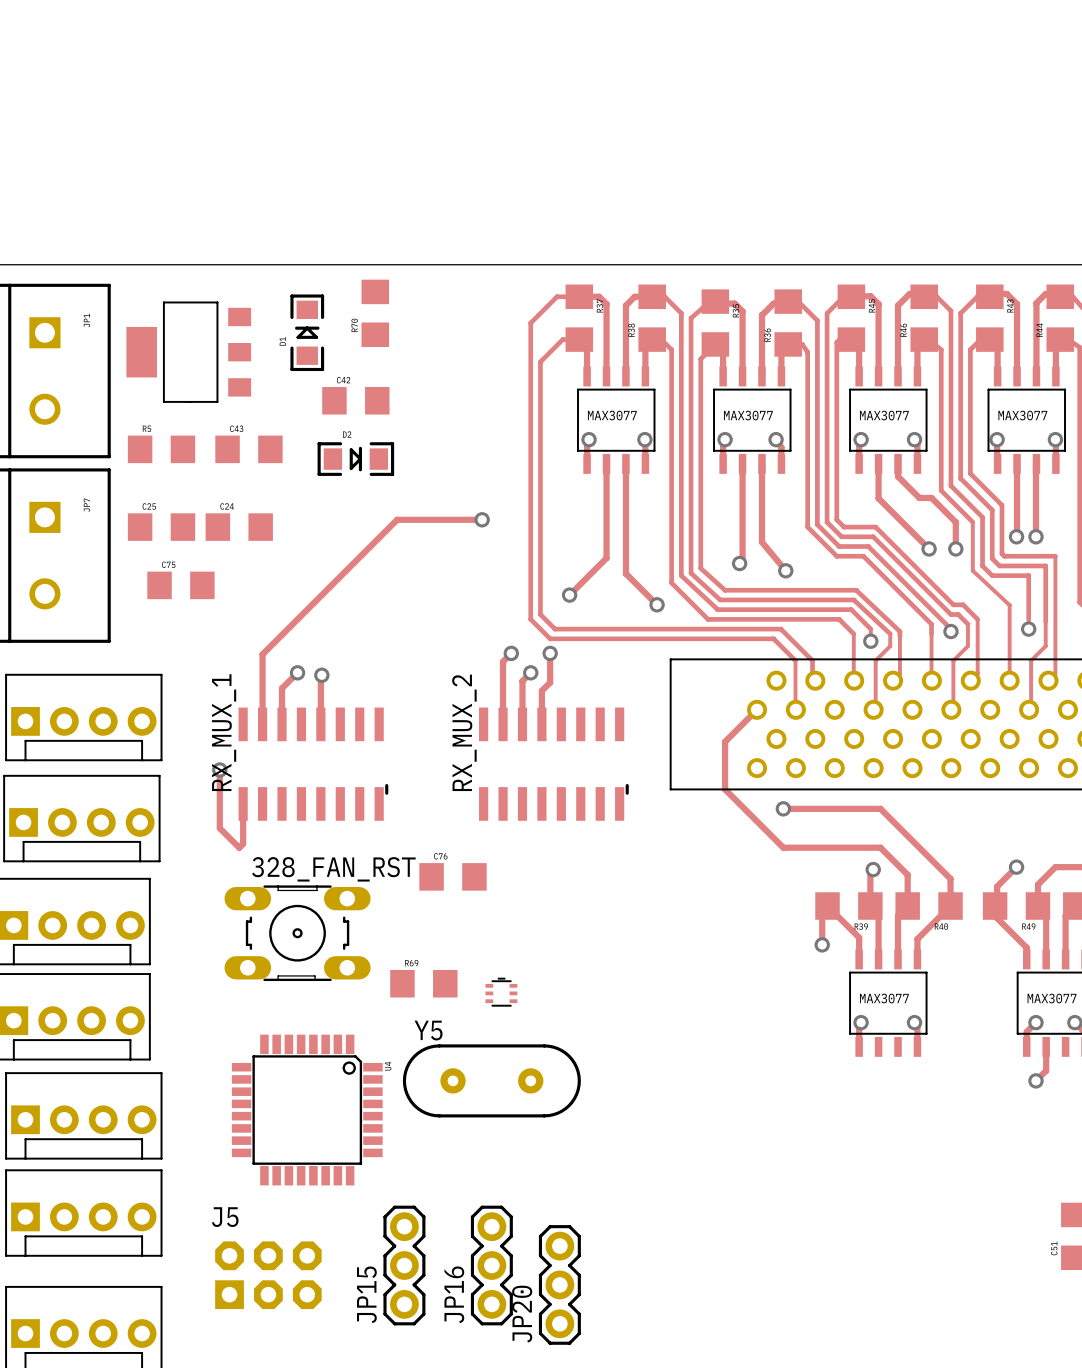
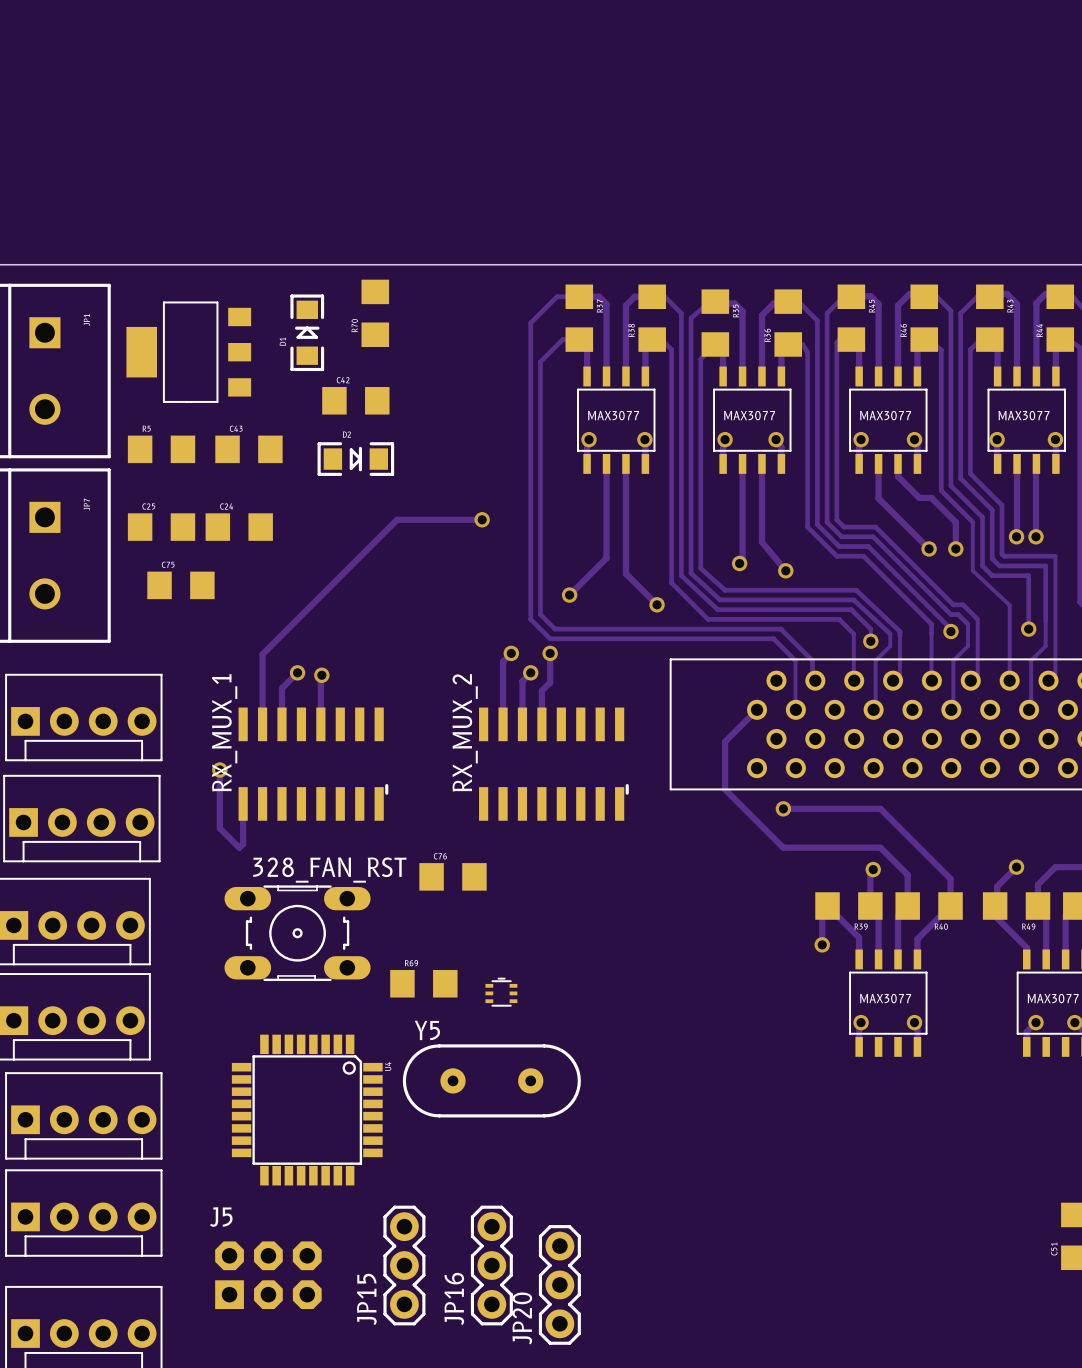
track: (1046, 1046) (1046, 1070) (1035, 1080) -> none
via: (1035, 1080) -> none

